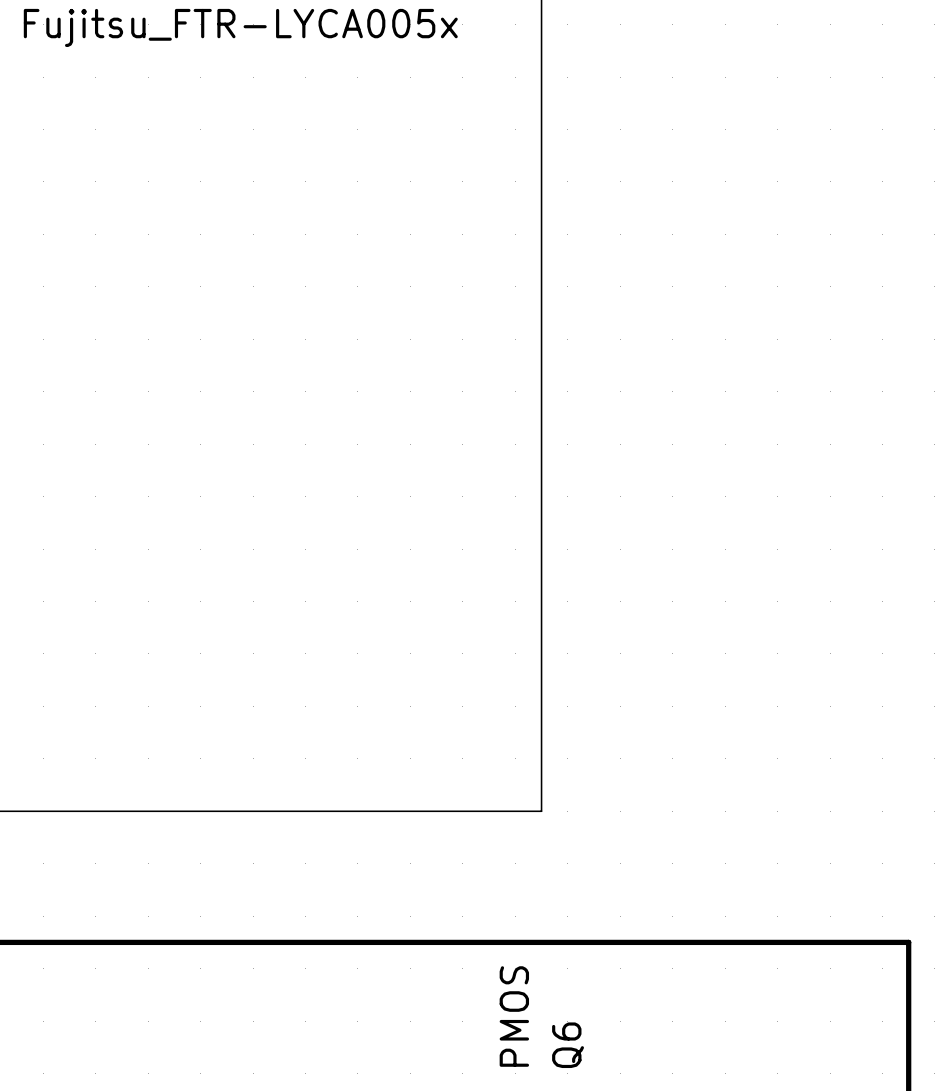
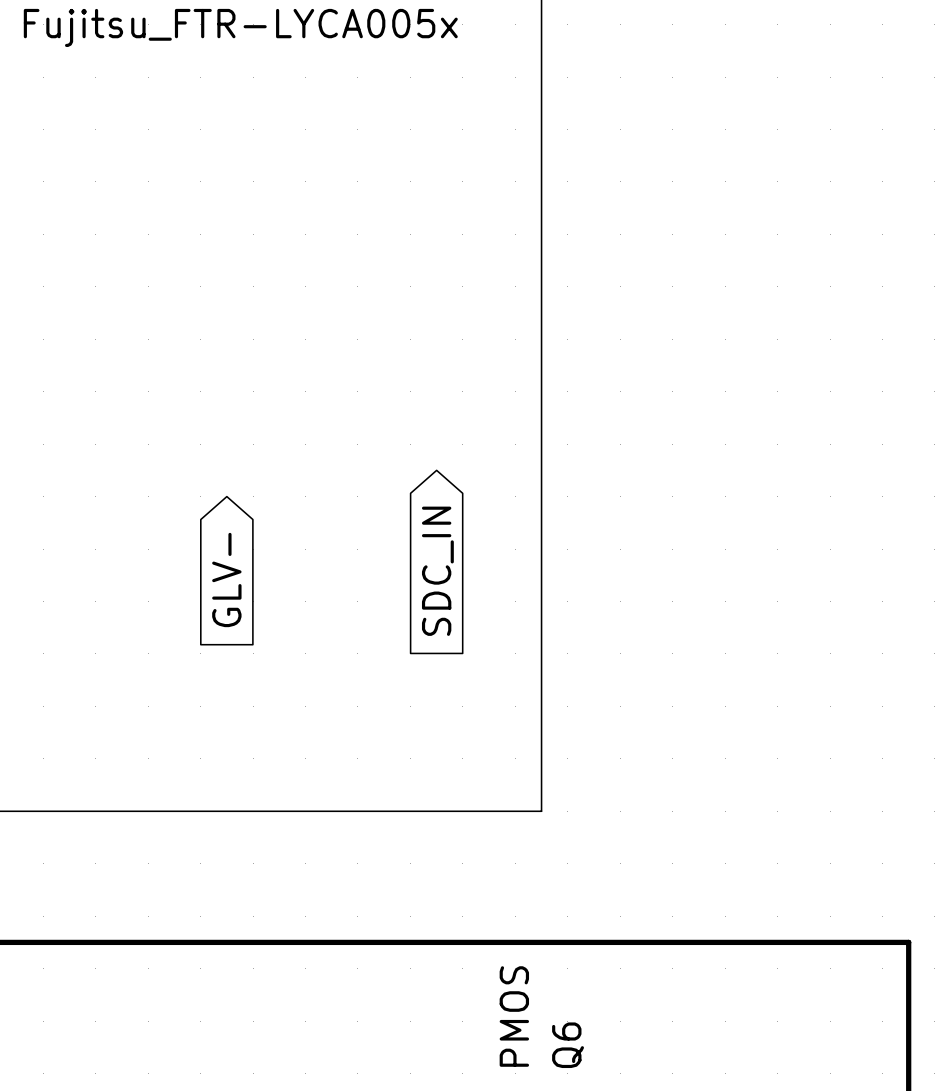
global label: none -> SDC_IN (437, 571)
global label: none -> GLV- (226, 579)

